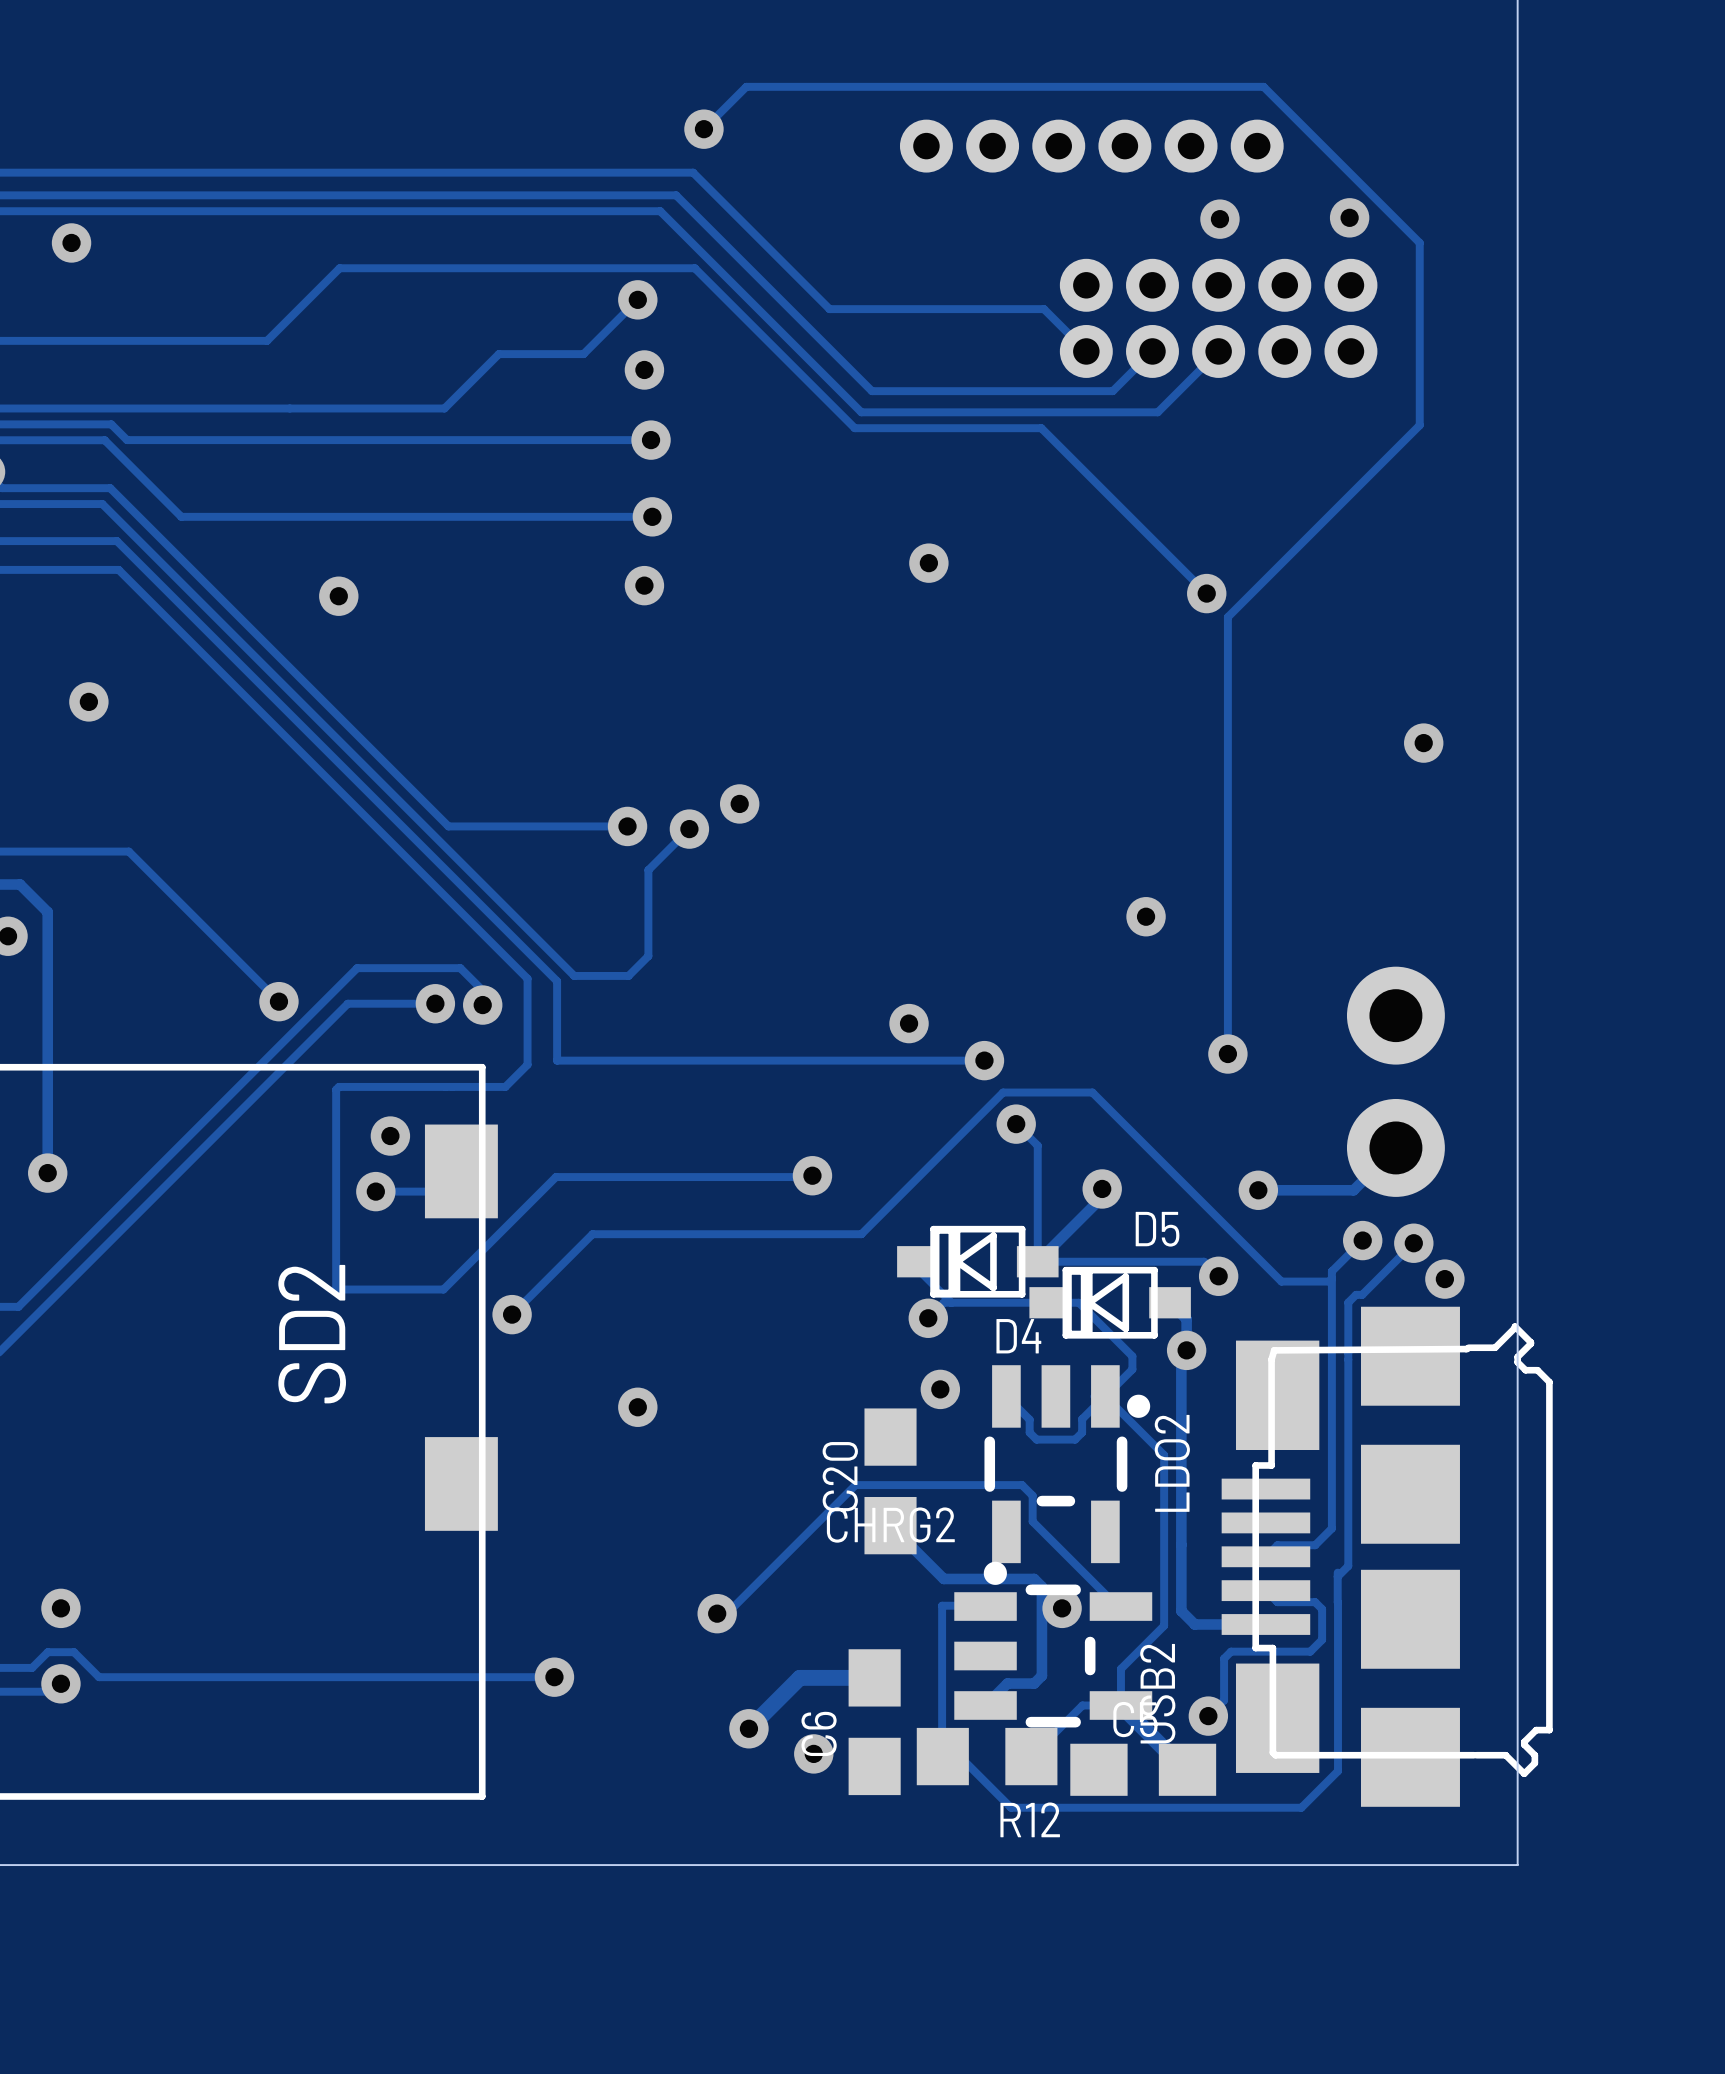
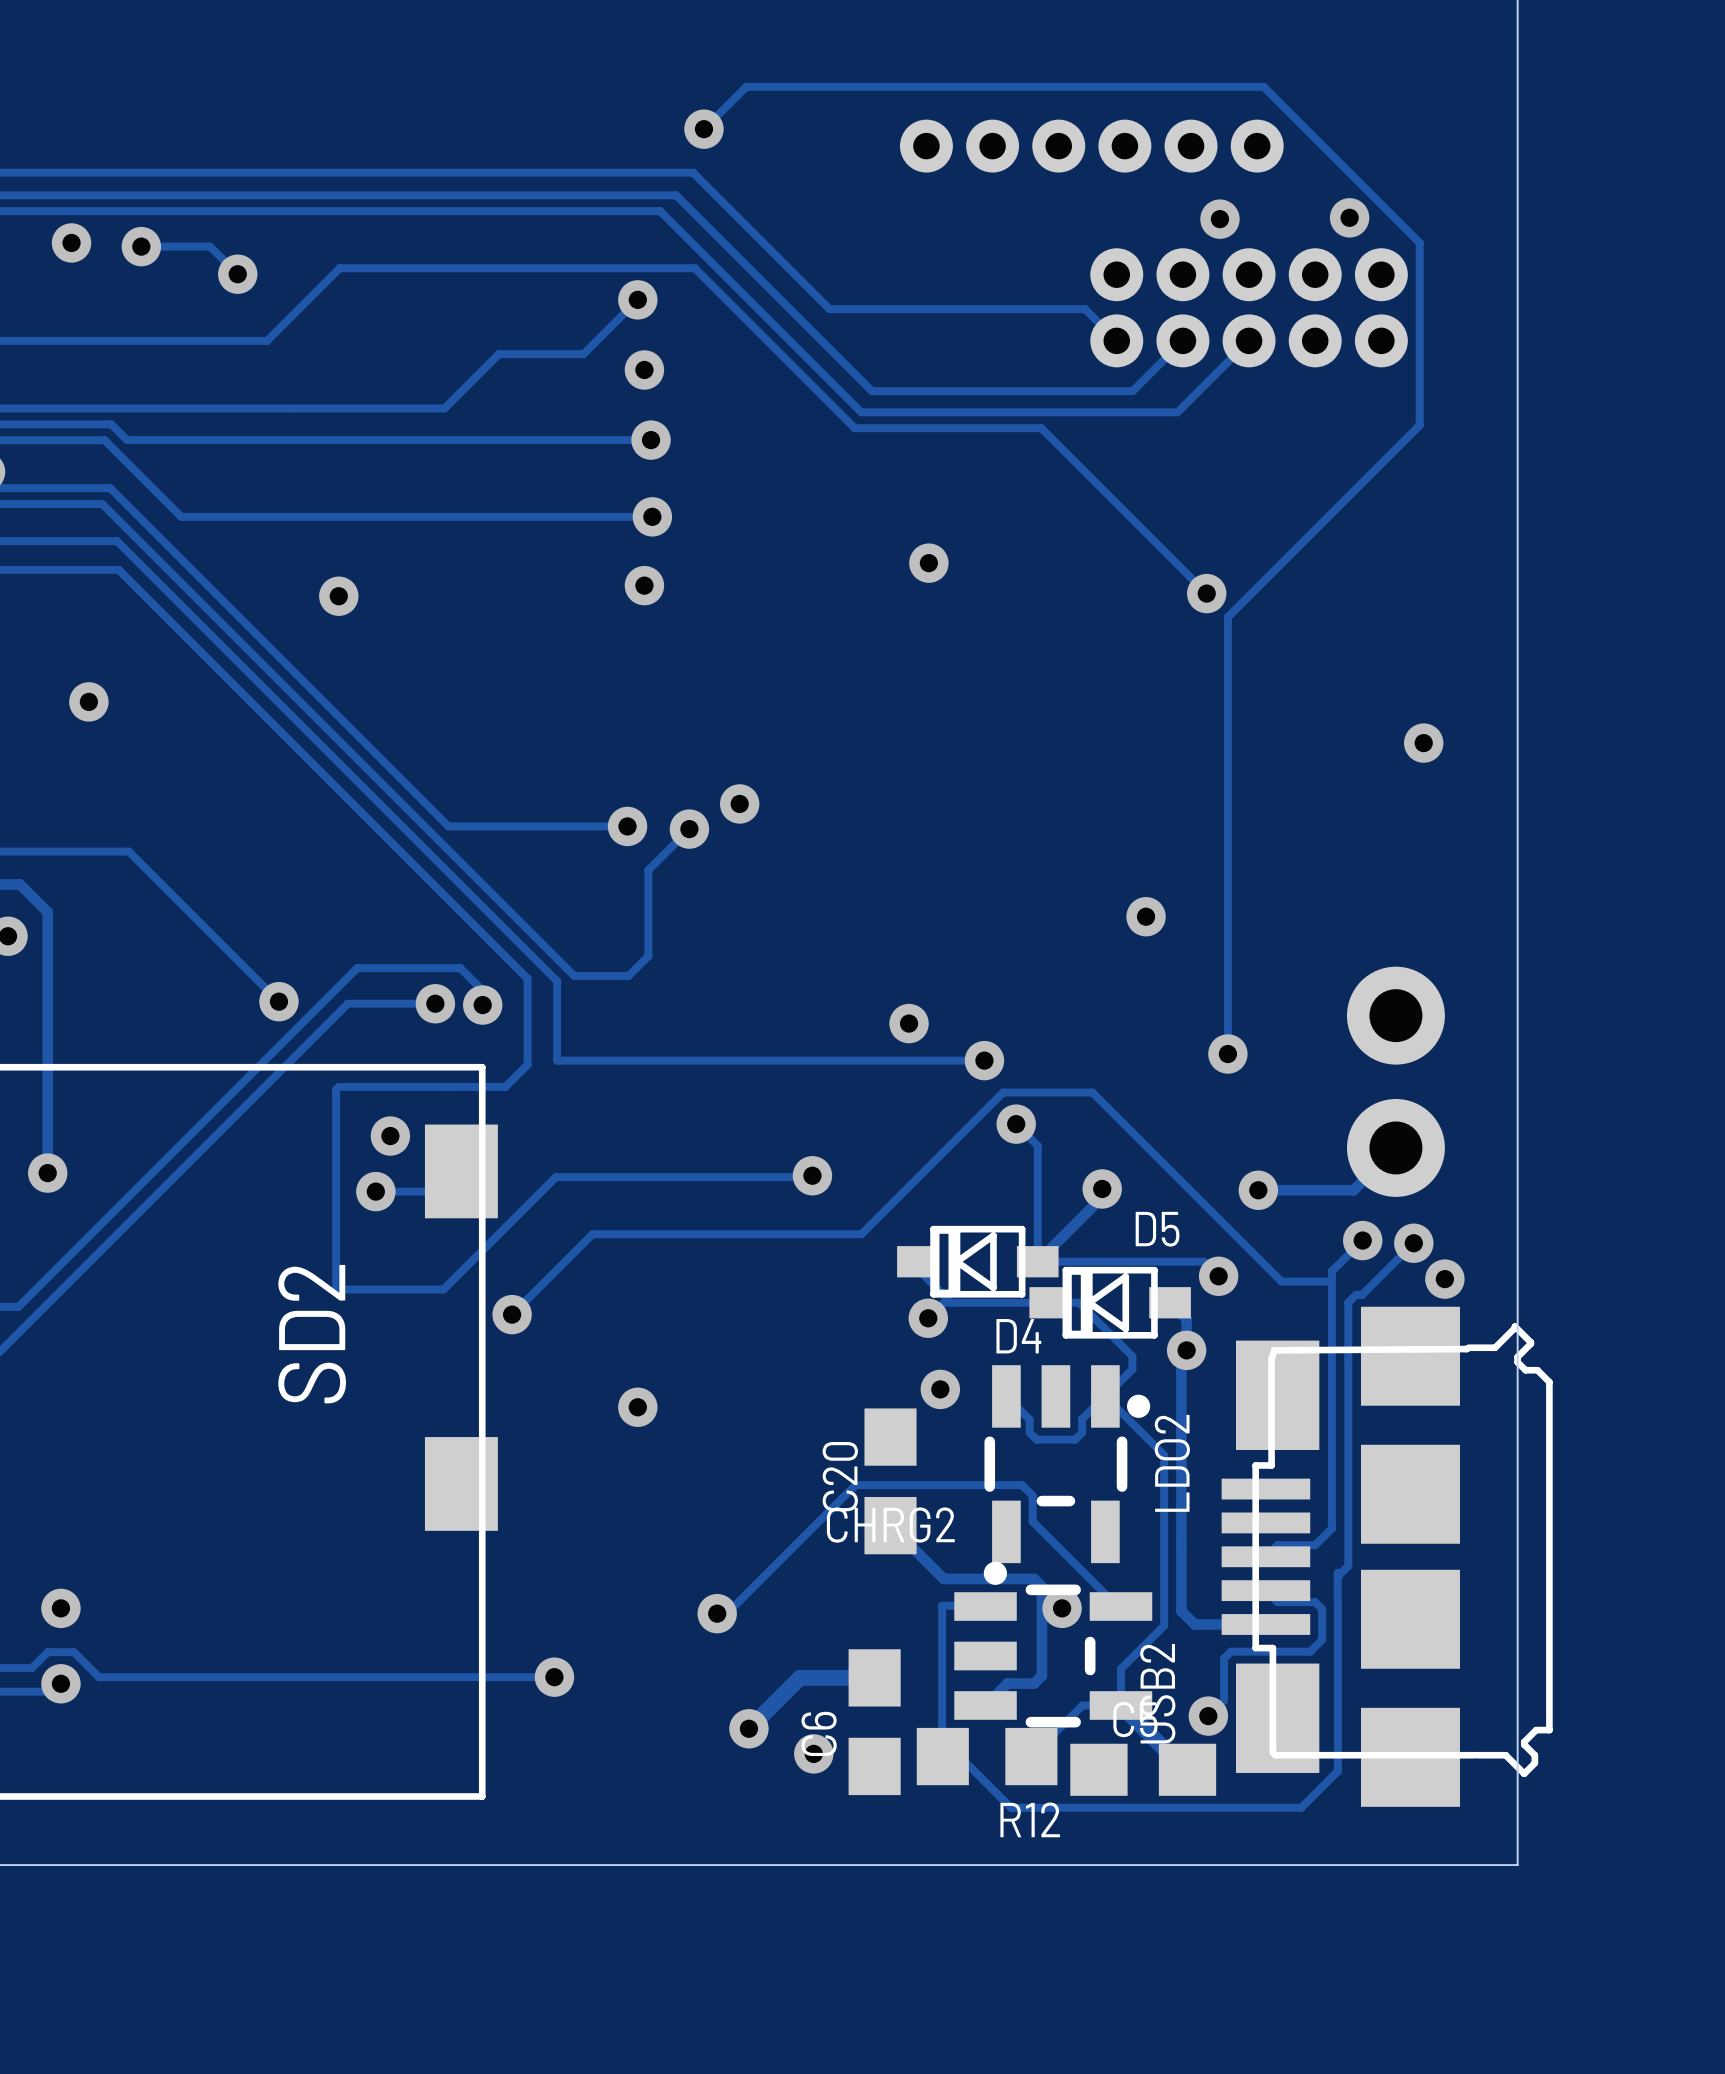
track: none -> (141, 246) (210, 246) (237, 274)
via: none -> (141, 246)
via: none -> (237, 274)
track: (1043, 309) (1086, 351) -> (1043, 309) (1085, 309) (1116, 340)
part position: (1218, 318) -> (1249, 307)
track: (1152, 351) (1112, 391) -> (1182, 340) (1132, 391) (1112, 391)
track: (1218, 351) (1157, 412) -> (1249, 340) (1177, 412) (1157, 412)

